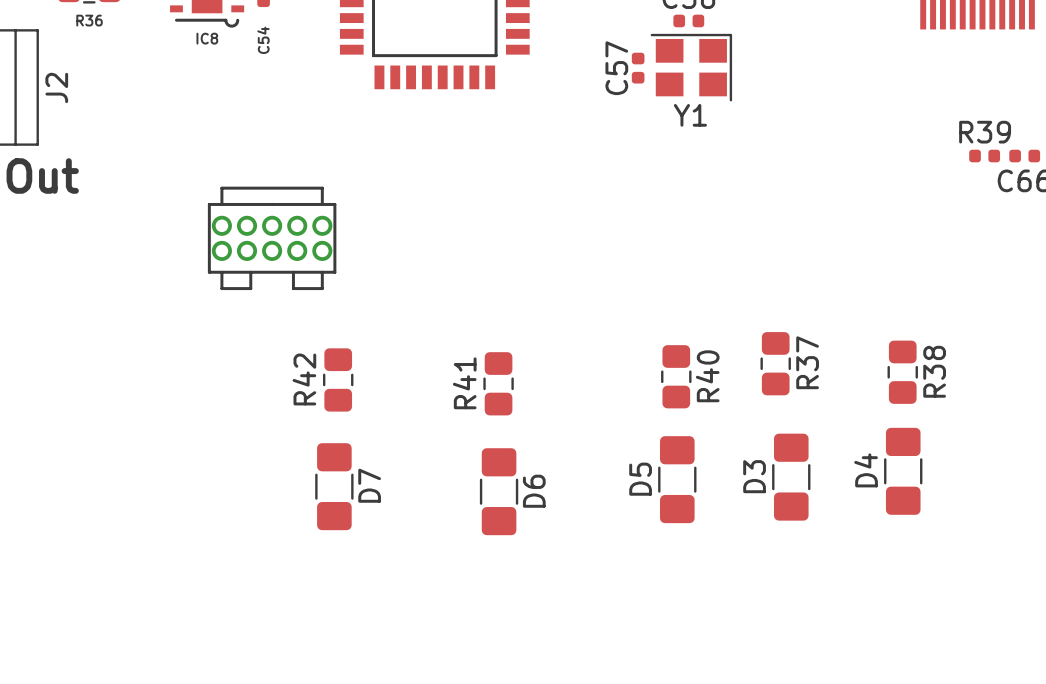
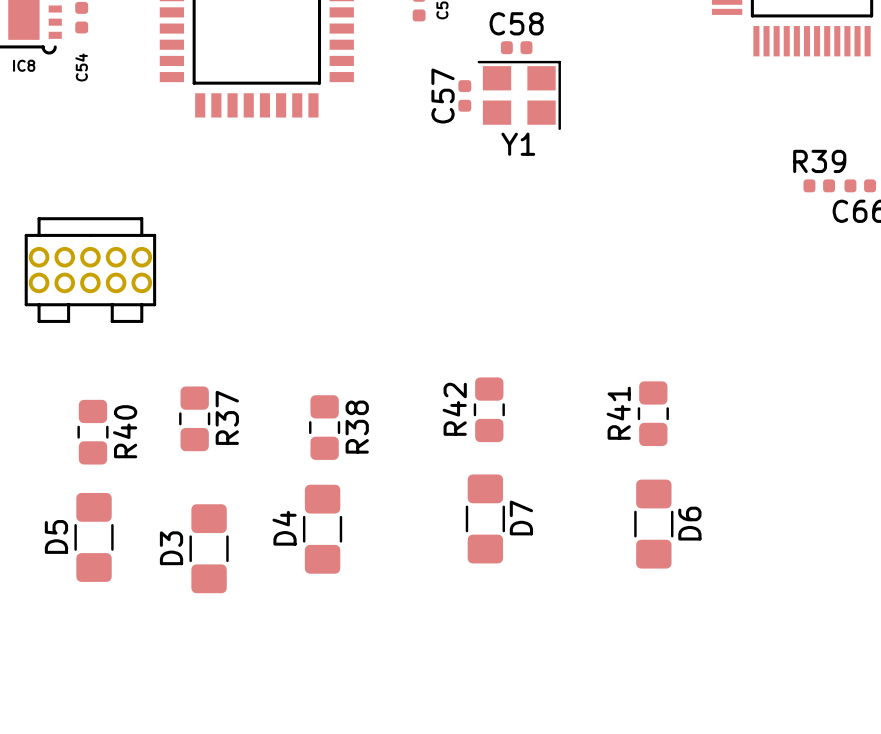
R37 position: (775, 363) -> (194, 418)
R38 position: (902, 372) -> (324, 427)
R40 position: (676, 376) -> (92, 432)
R42 position: (338, 379) -> (489, 409)
R41 position: (498, 383) -> (653, 413)
D4: (903, 471) -> none
D3 position: (791, 477) -> (209, 548)
D5 position: (677, 479) -> (94, 537)
D7 position: (334, 486) -> (485, 518)
D6: none -> (653, 524)
D6 name: D6 (534, 491) -> D4 (284, 528)

